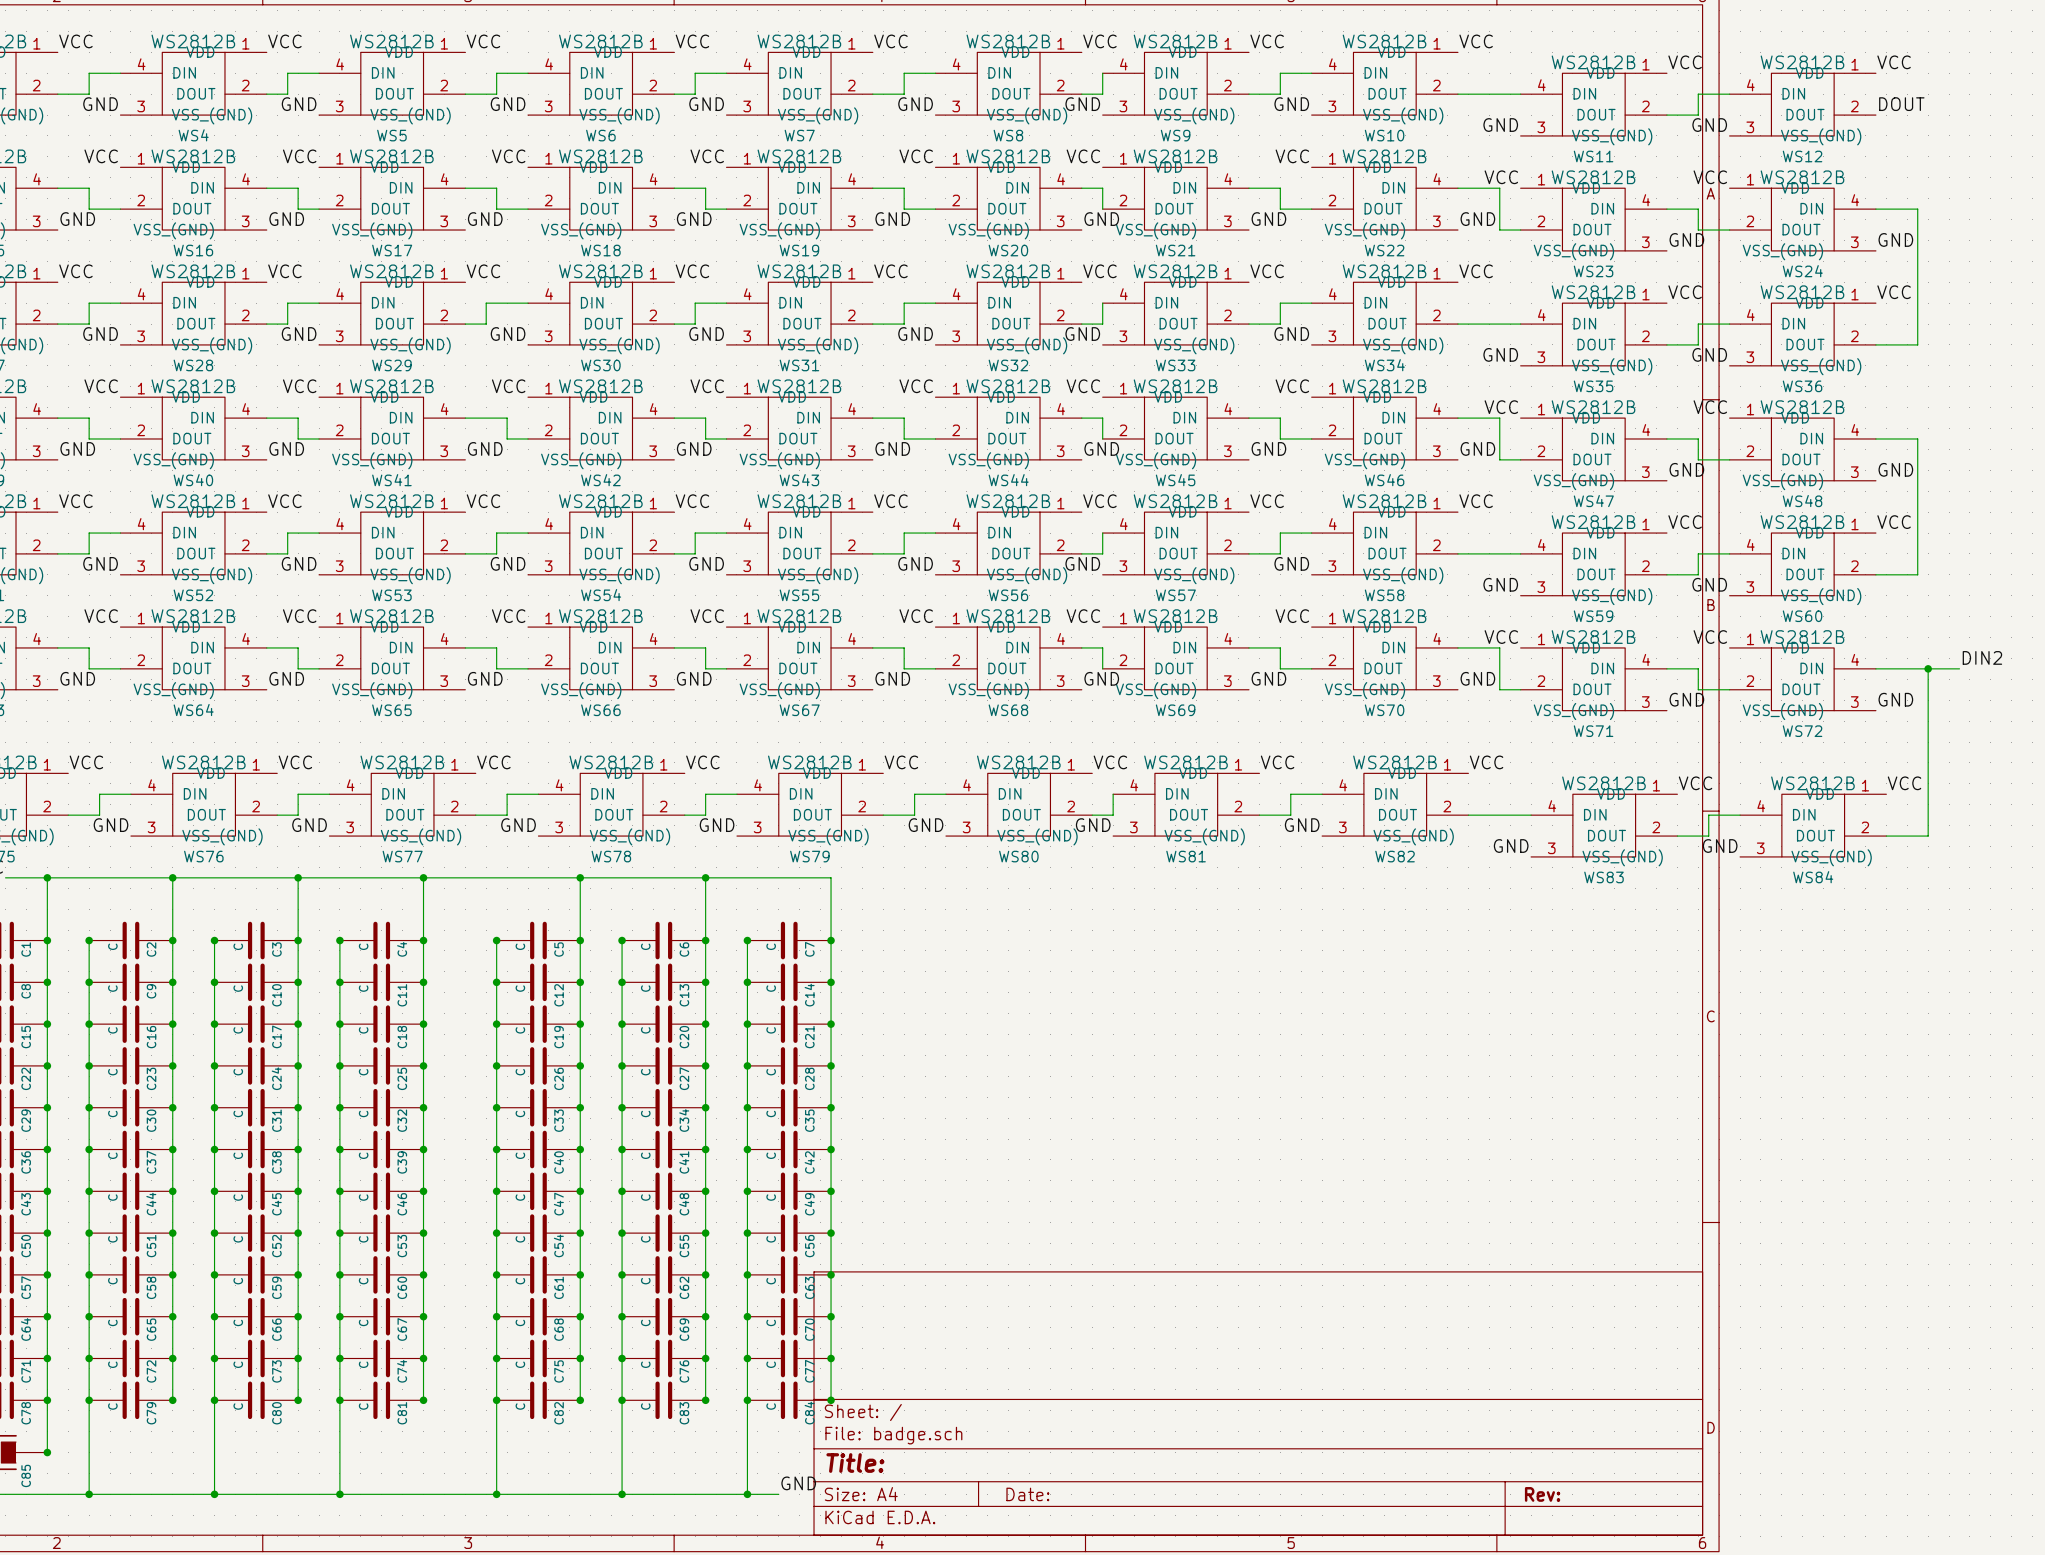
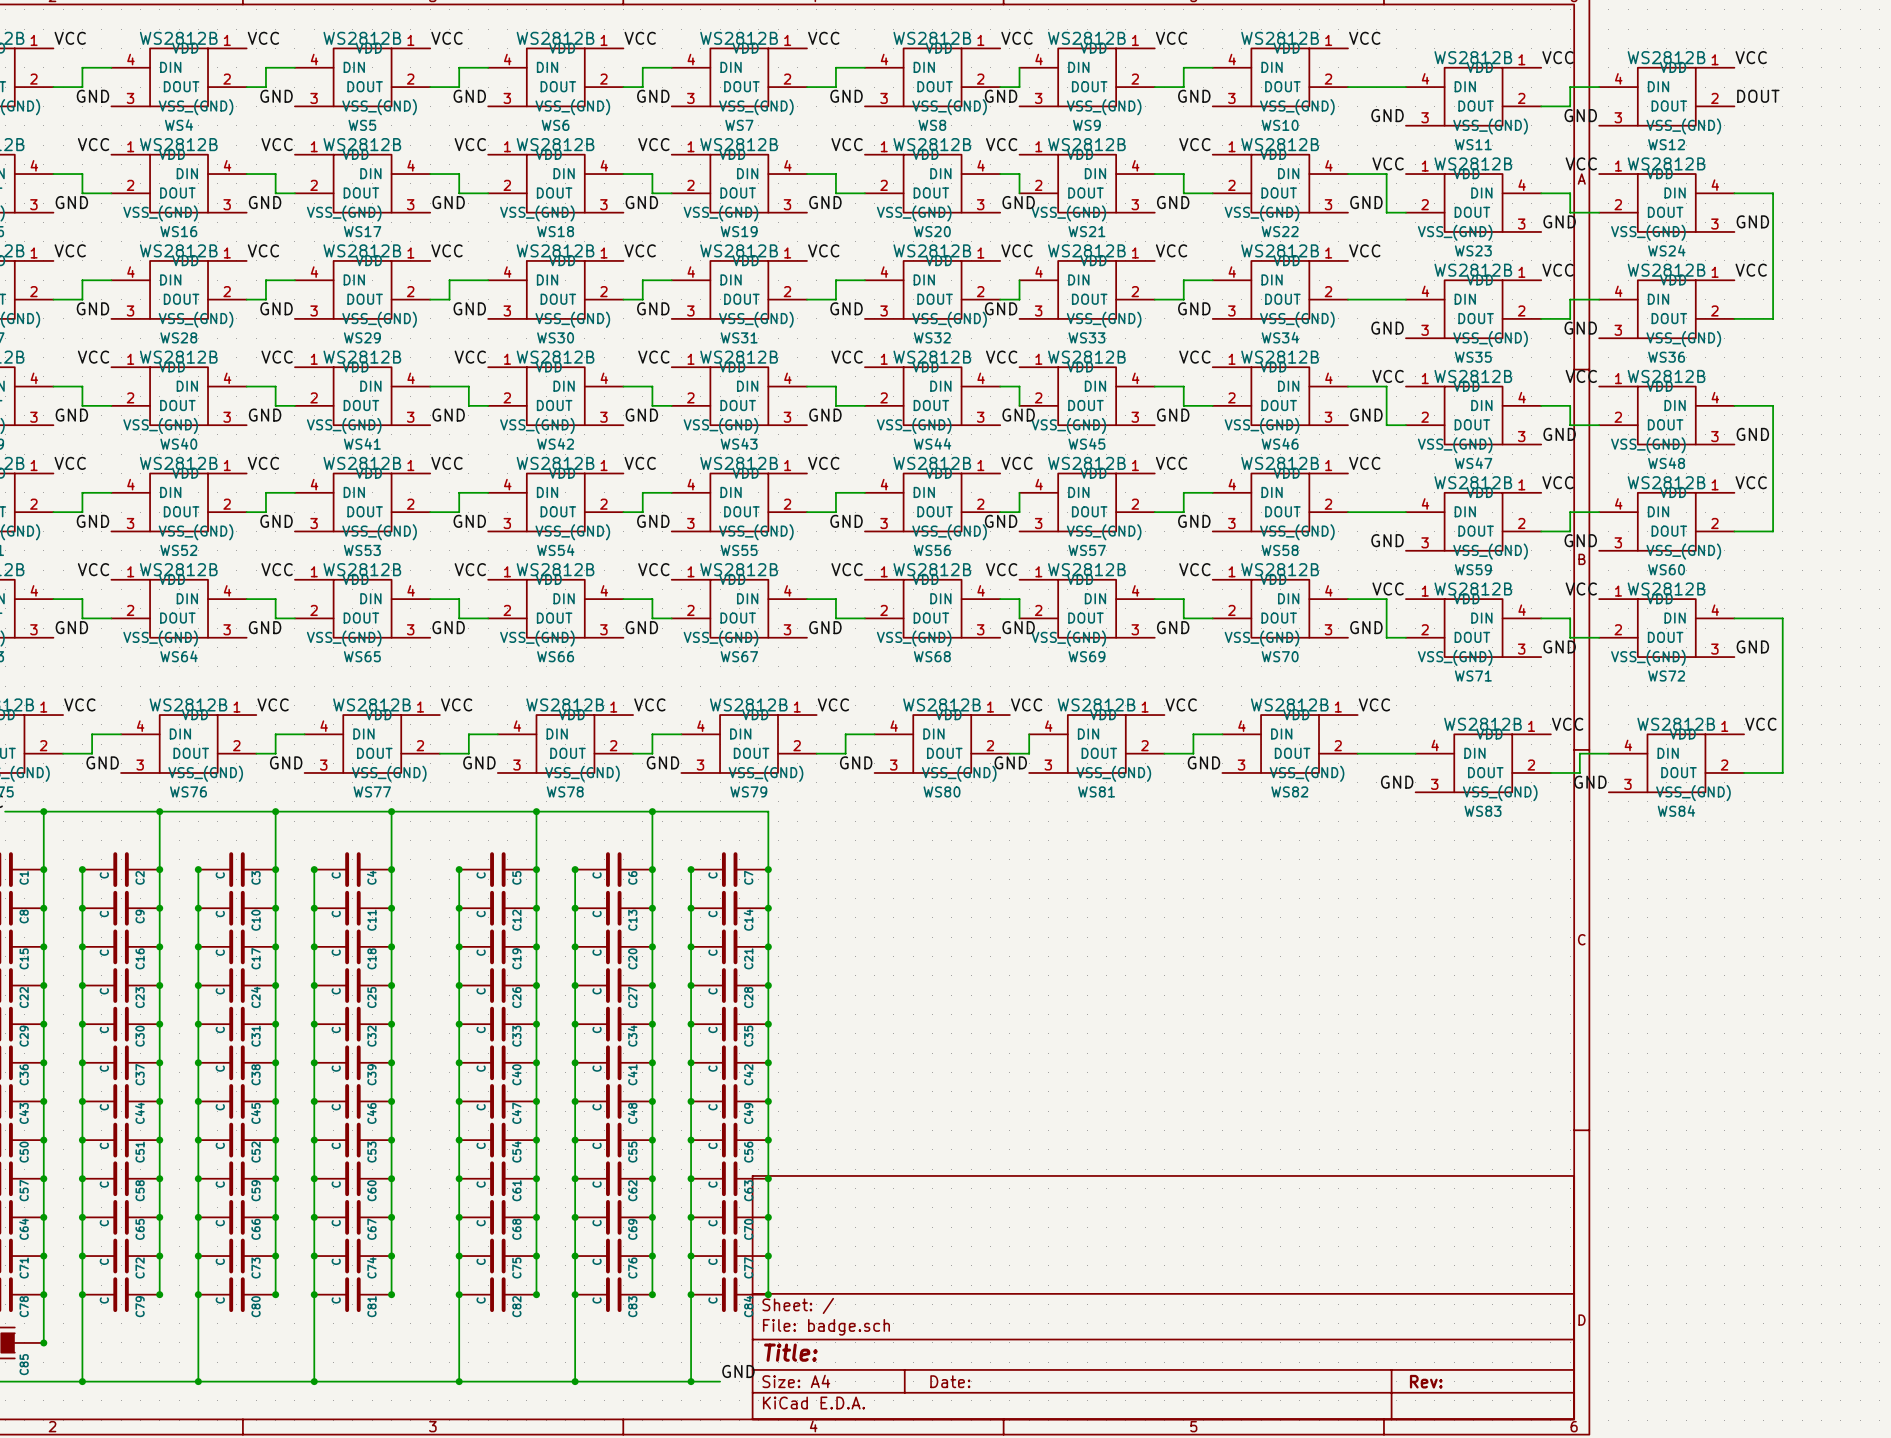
label: DIN2 (1982, 657) -> none
wire: (1928, 668) (1959, 668) -> none
junction: (1928, 668) -> none

